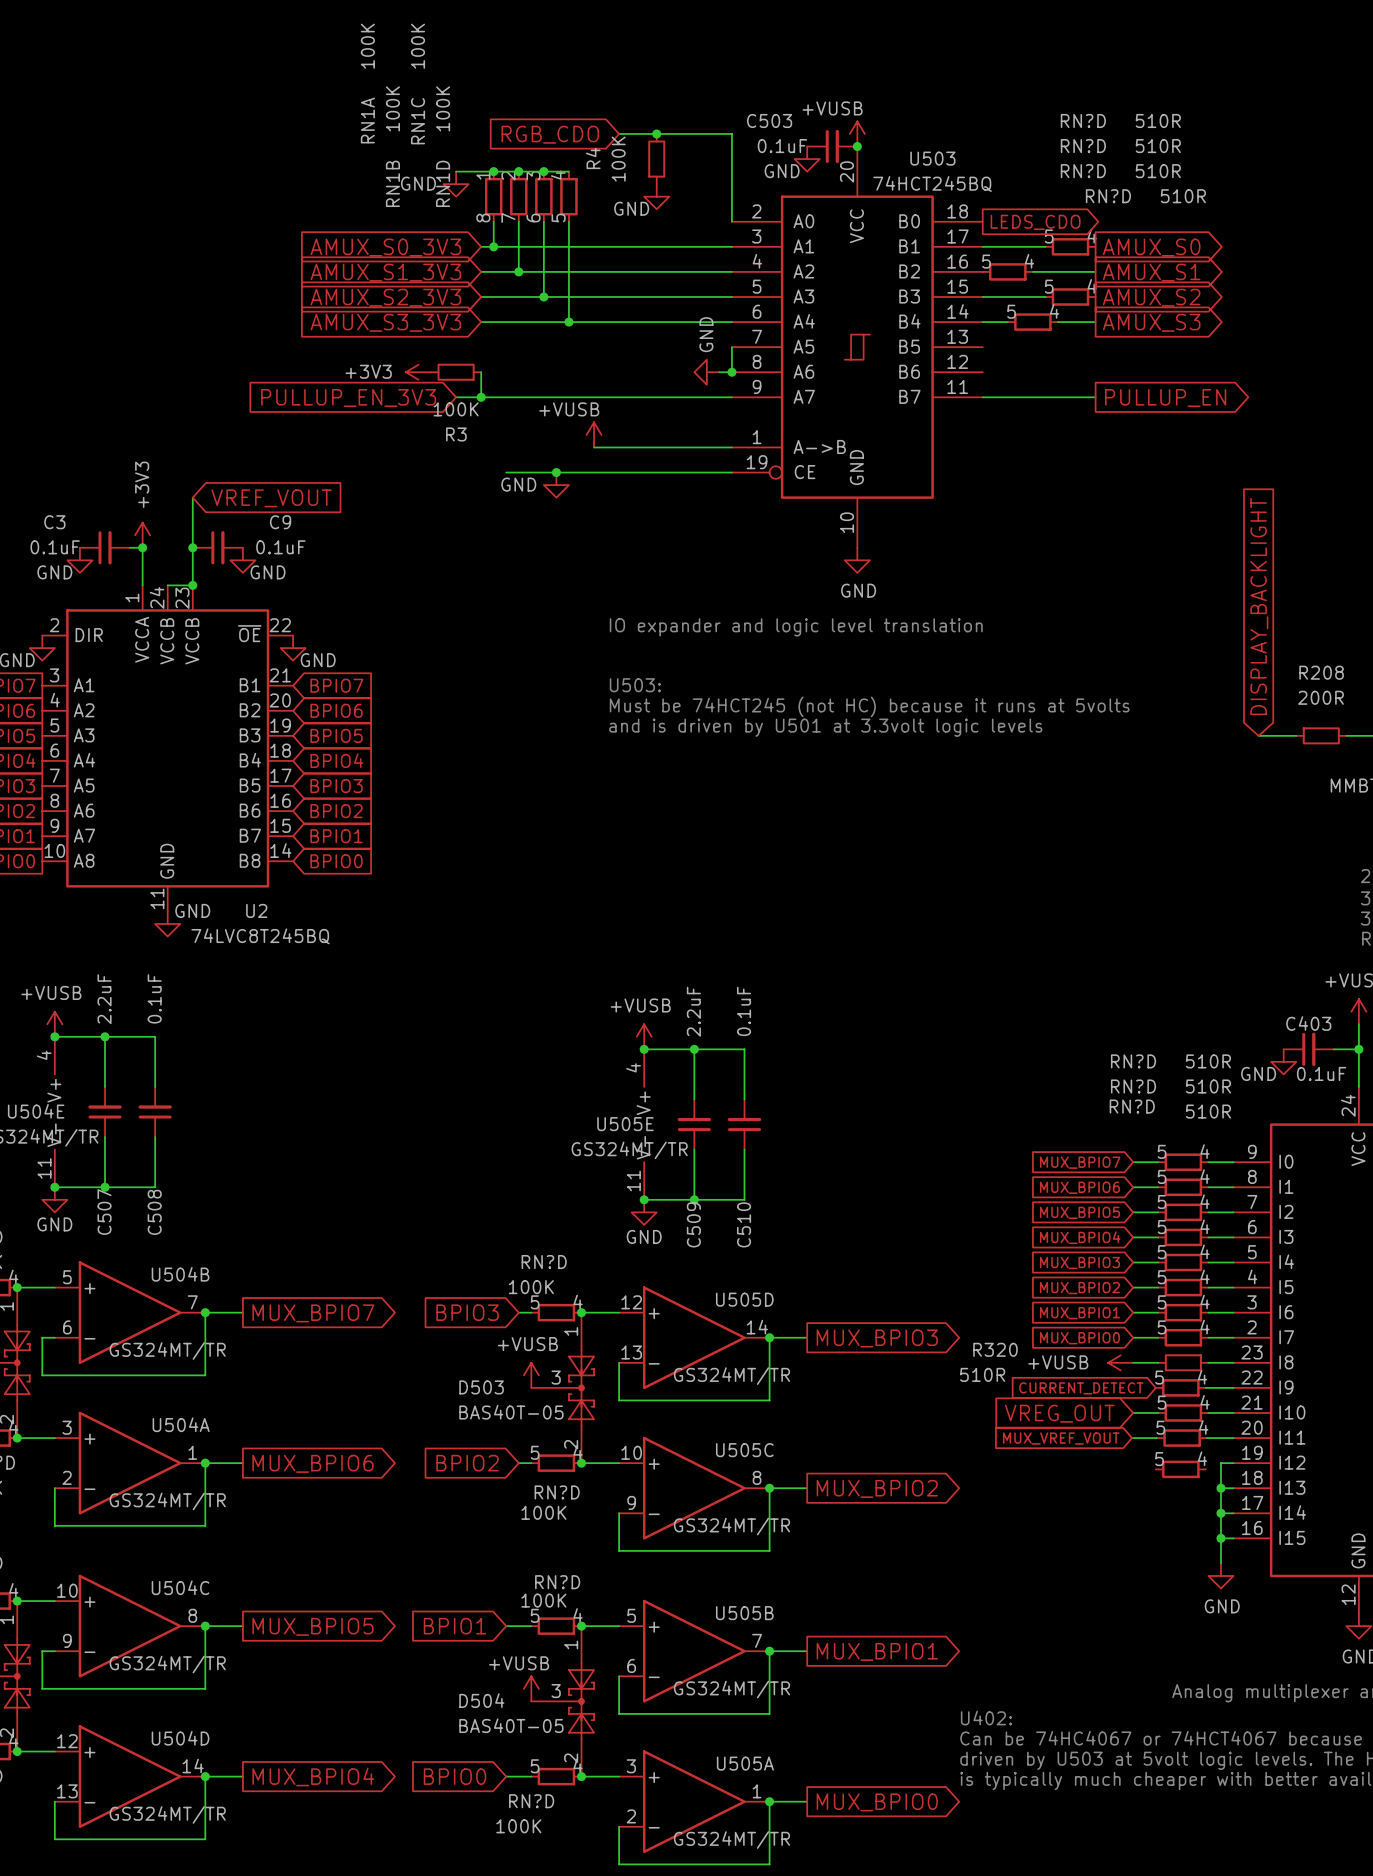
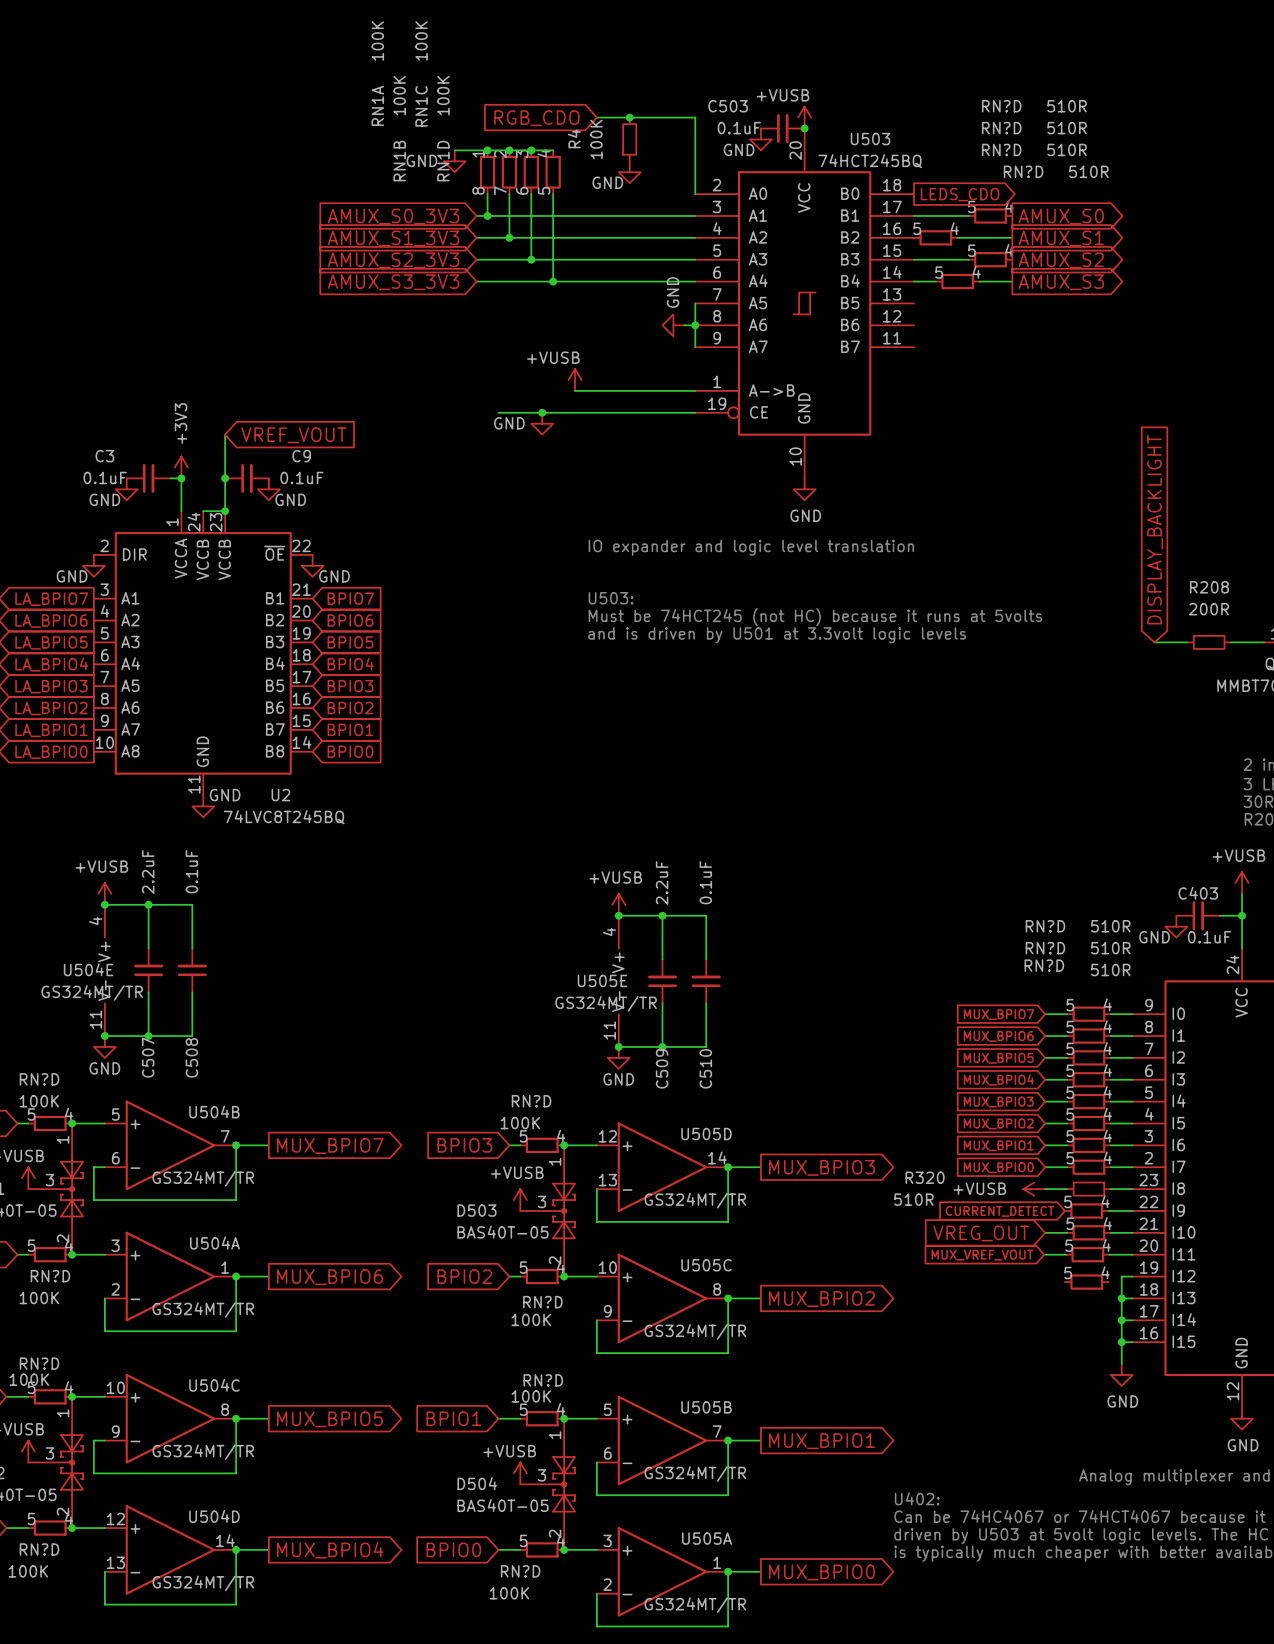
power symbol: +3V3 (418, 372) -> none
R3: 100K (456, 372) -> none
wire: (481, 372) (481, 397) -> none
wire: (456, 397) (731, 397) -> (695, 325) (695, 347)
junction: (481, 397) -> none
wire: (982, 397) (1095, 397) -> none
global label: PULLUP_EN_3V3 (348, 398) -> none
global label: PULLUP_EN (1165, 398) -> none

